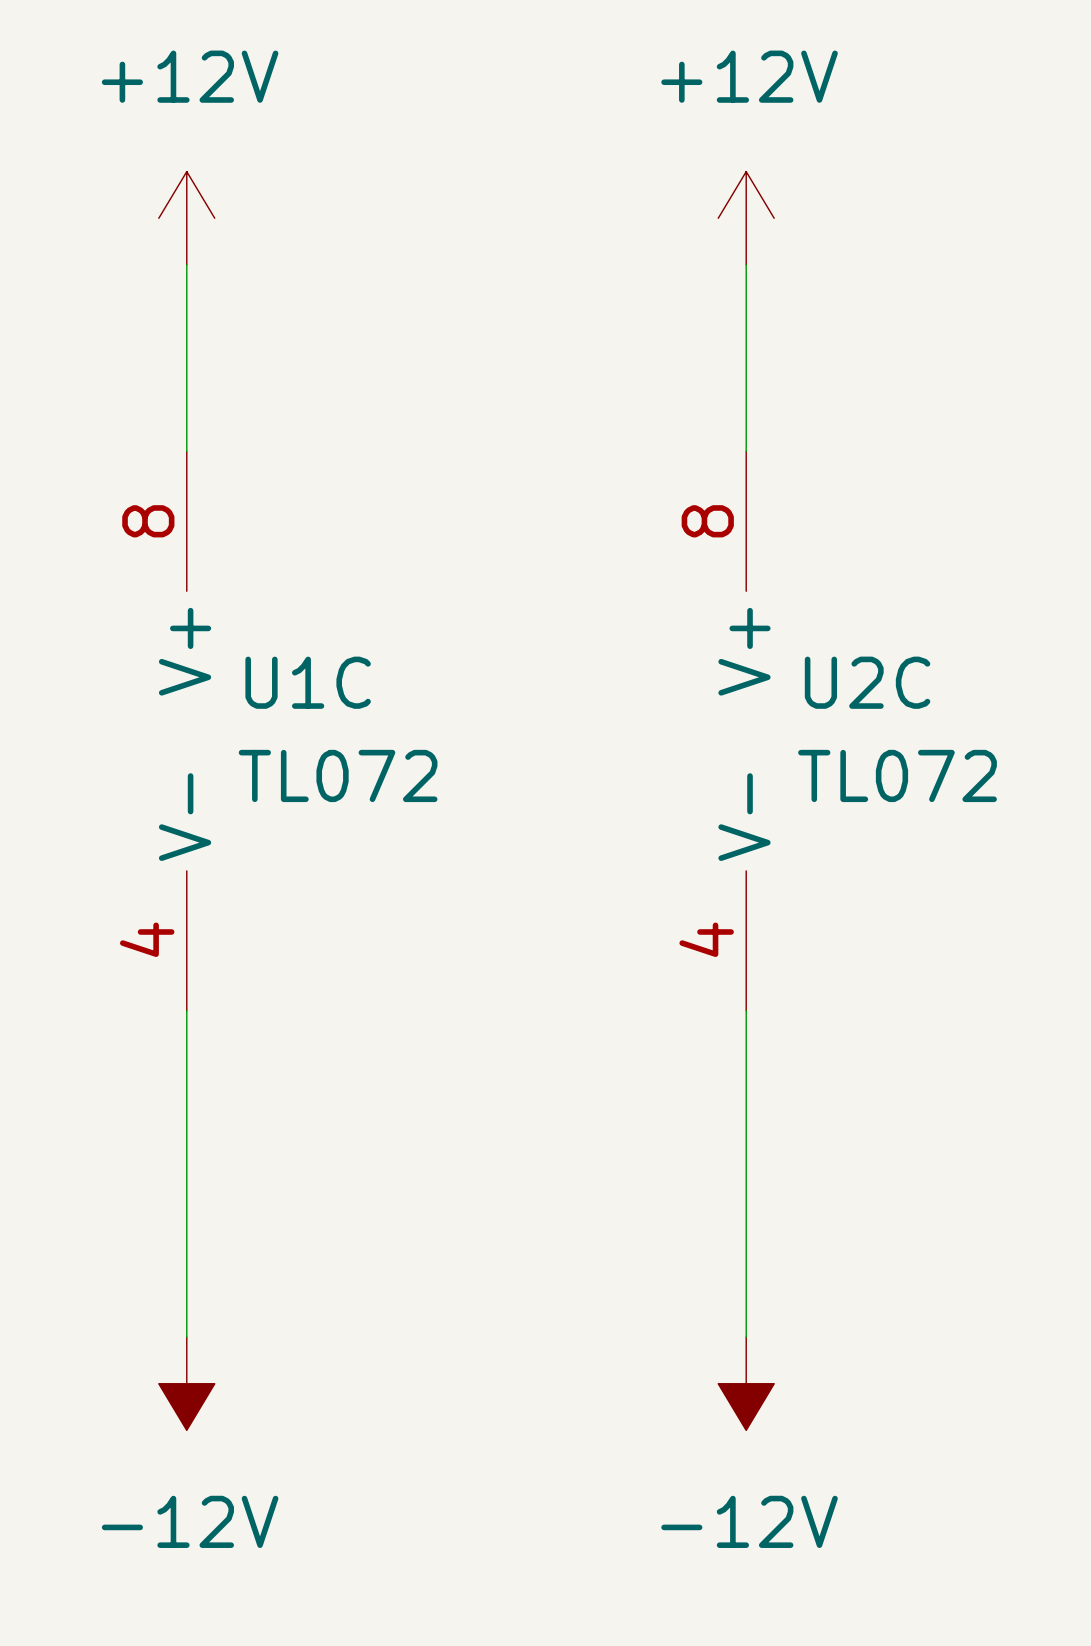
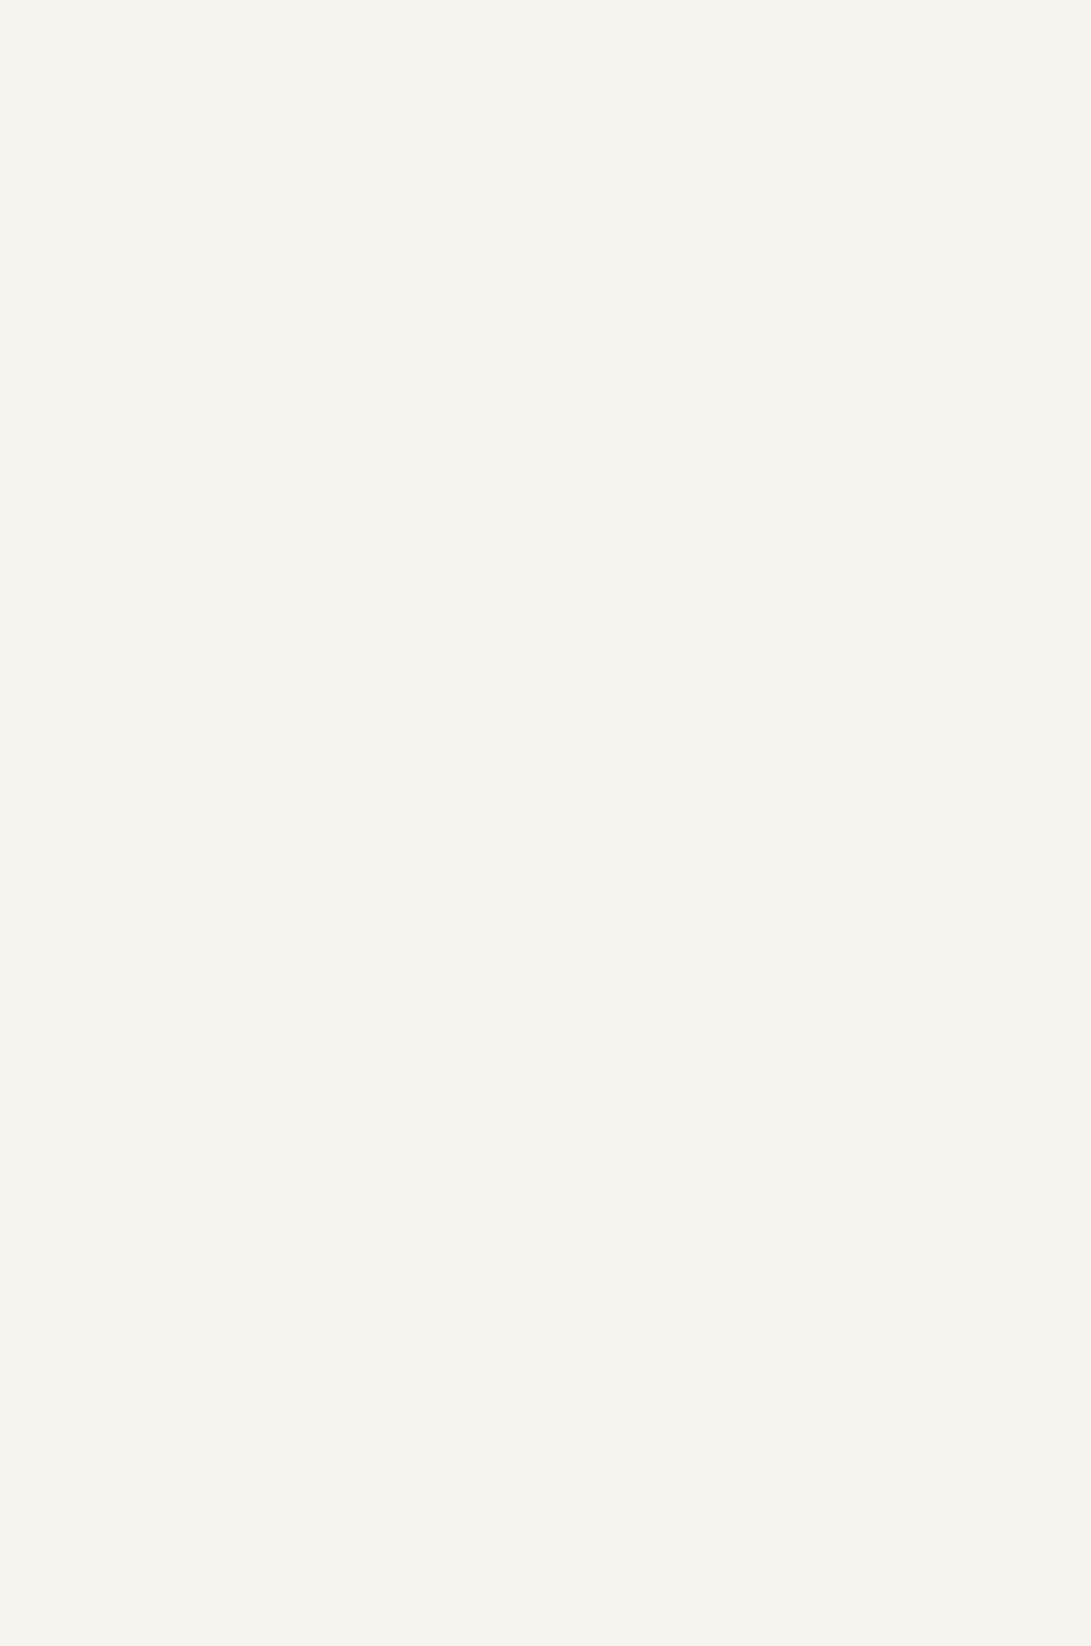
power symbol: +12V (186, 218) -> none
power symbol: +12V (746, 218) -> none
wire: (186, 264) (186, 451) -> none
wire: (746, 264) (746, 451) -> none
U1C: TL072 (186, 731) -> none
U2C: TL072 (746, 731) -> none
wire: (186, 1010) (186, 1337) -> none
wire: (746, 1010) (746, 1337) -> none
power symbol: -12V (186, 1383) -> none
power symbol: -12V (746, 1383) -> none

